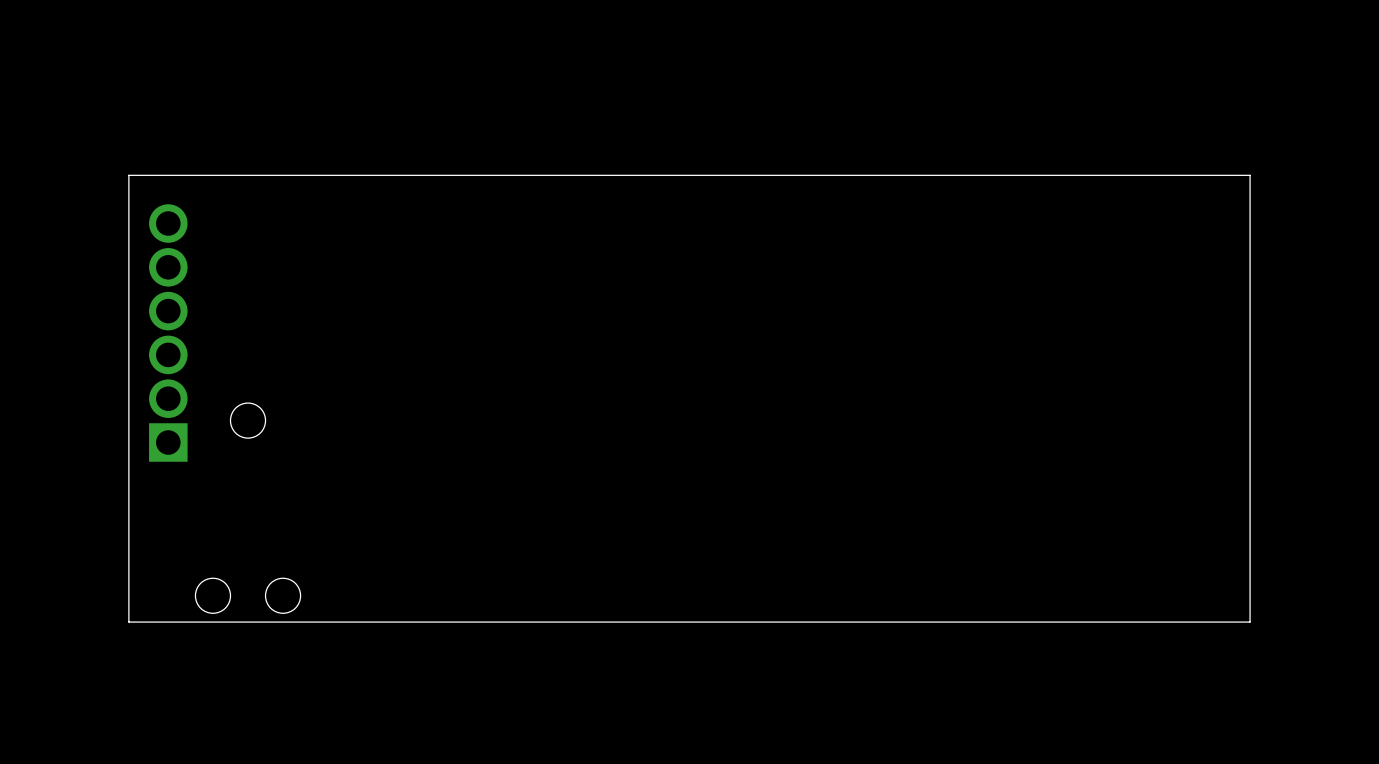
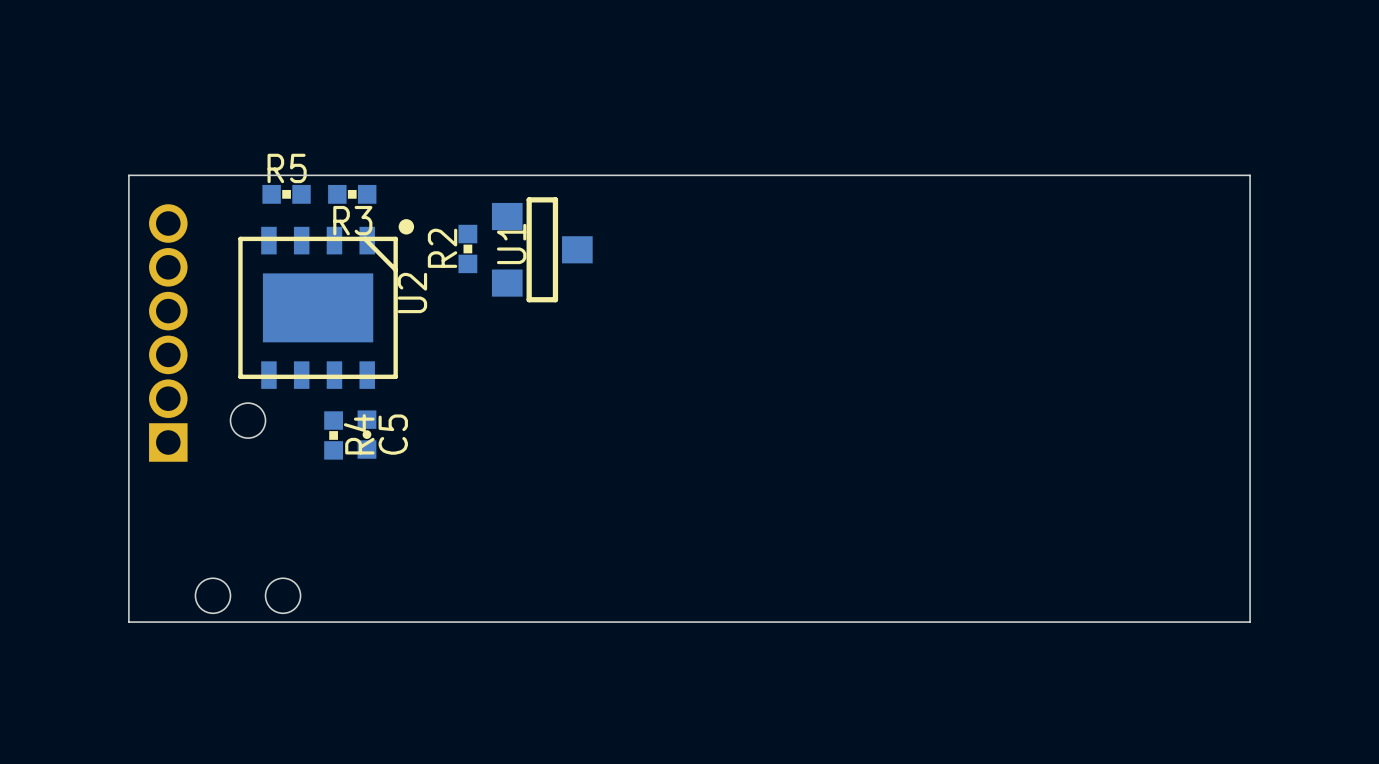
R5: none -> (286, 194)
R3: none -> (352, 194)
R2: none -> (467, 248)
U1: none -> (542, 249)
U2: none -> (326, 304)
C5: none -> (366, 434)
R4: none -> (333, 435)

